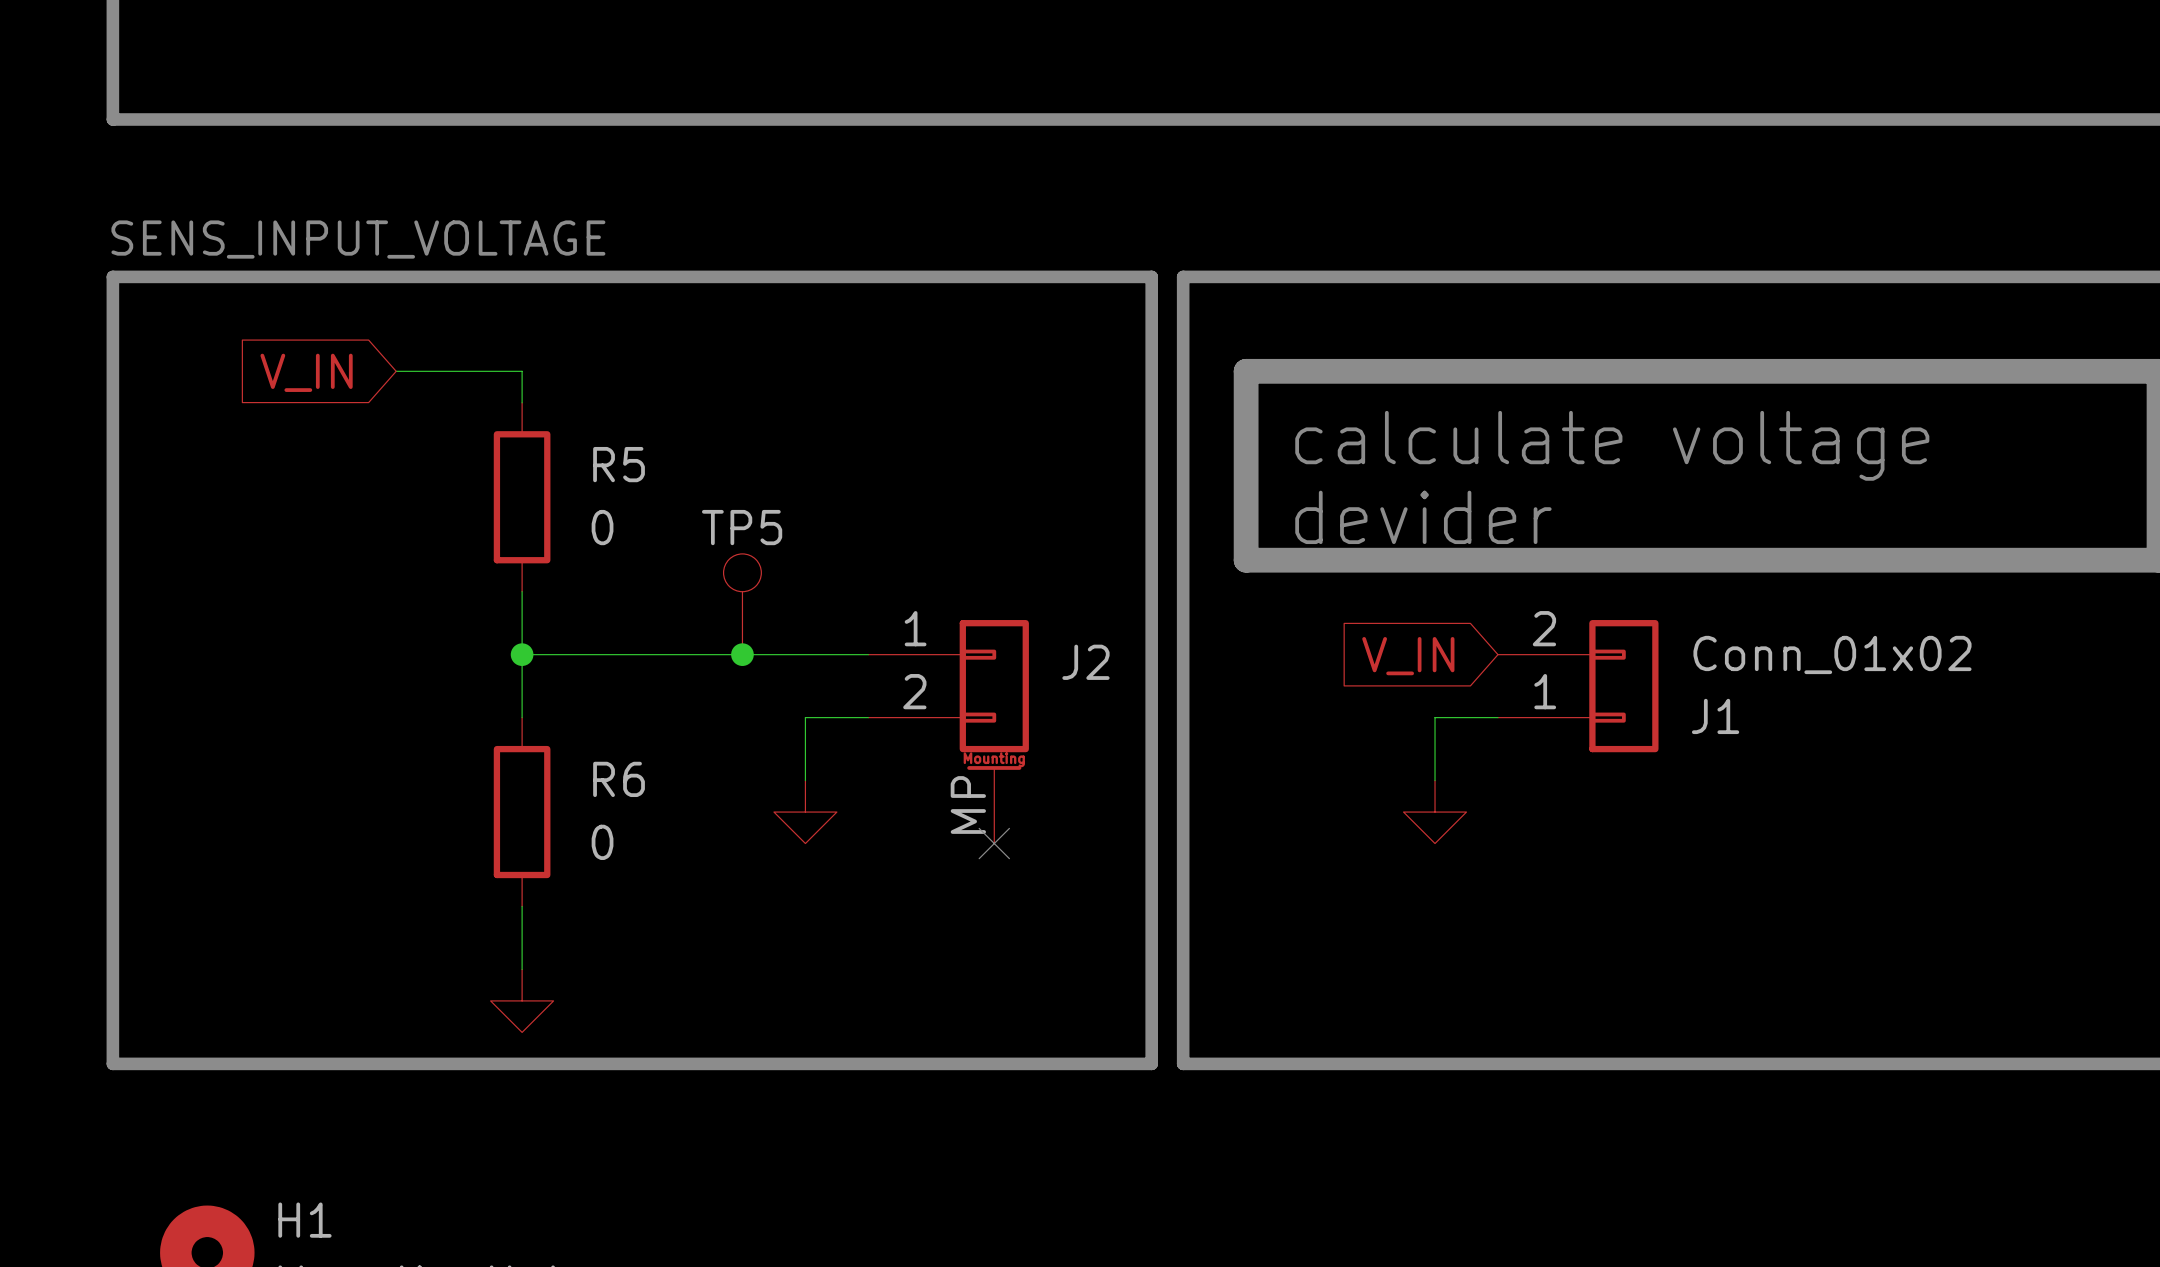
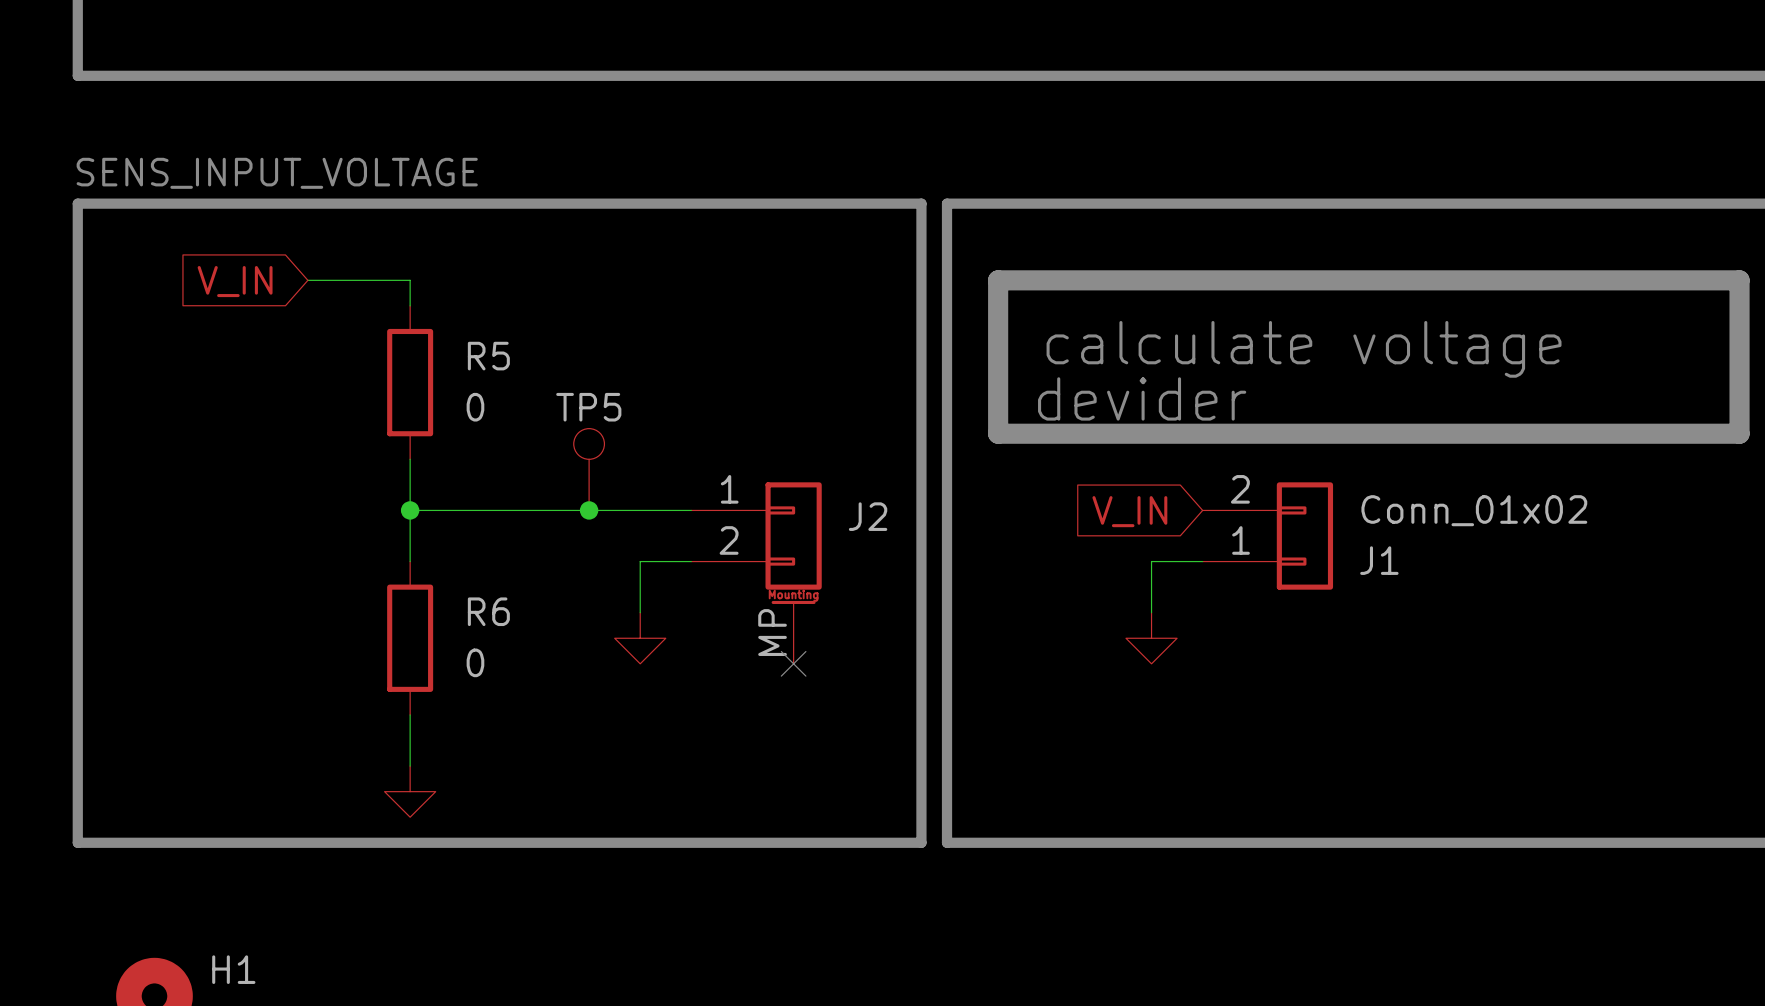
text position: calculate voltage (1612, 445) -> calculate voltage (1304, 349)

